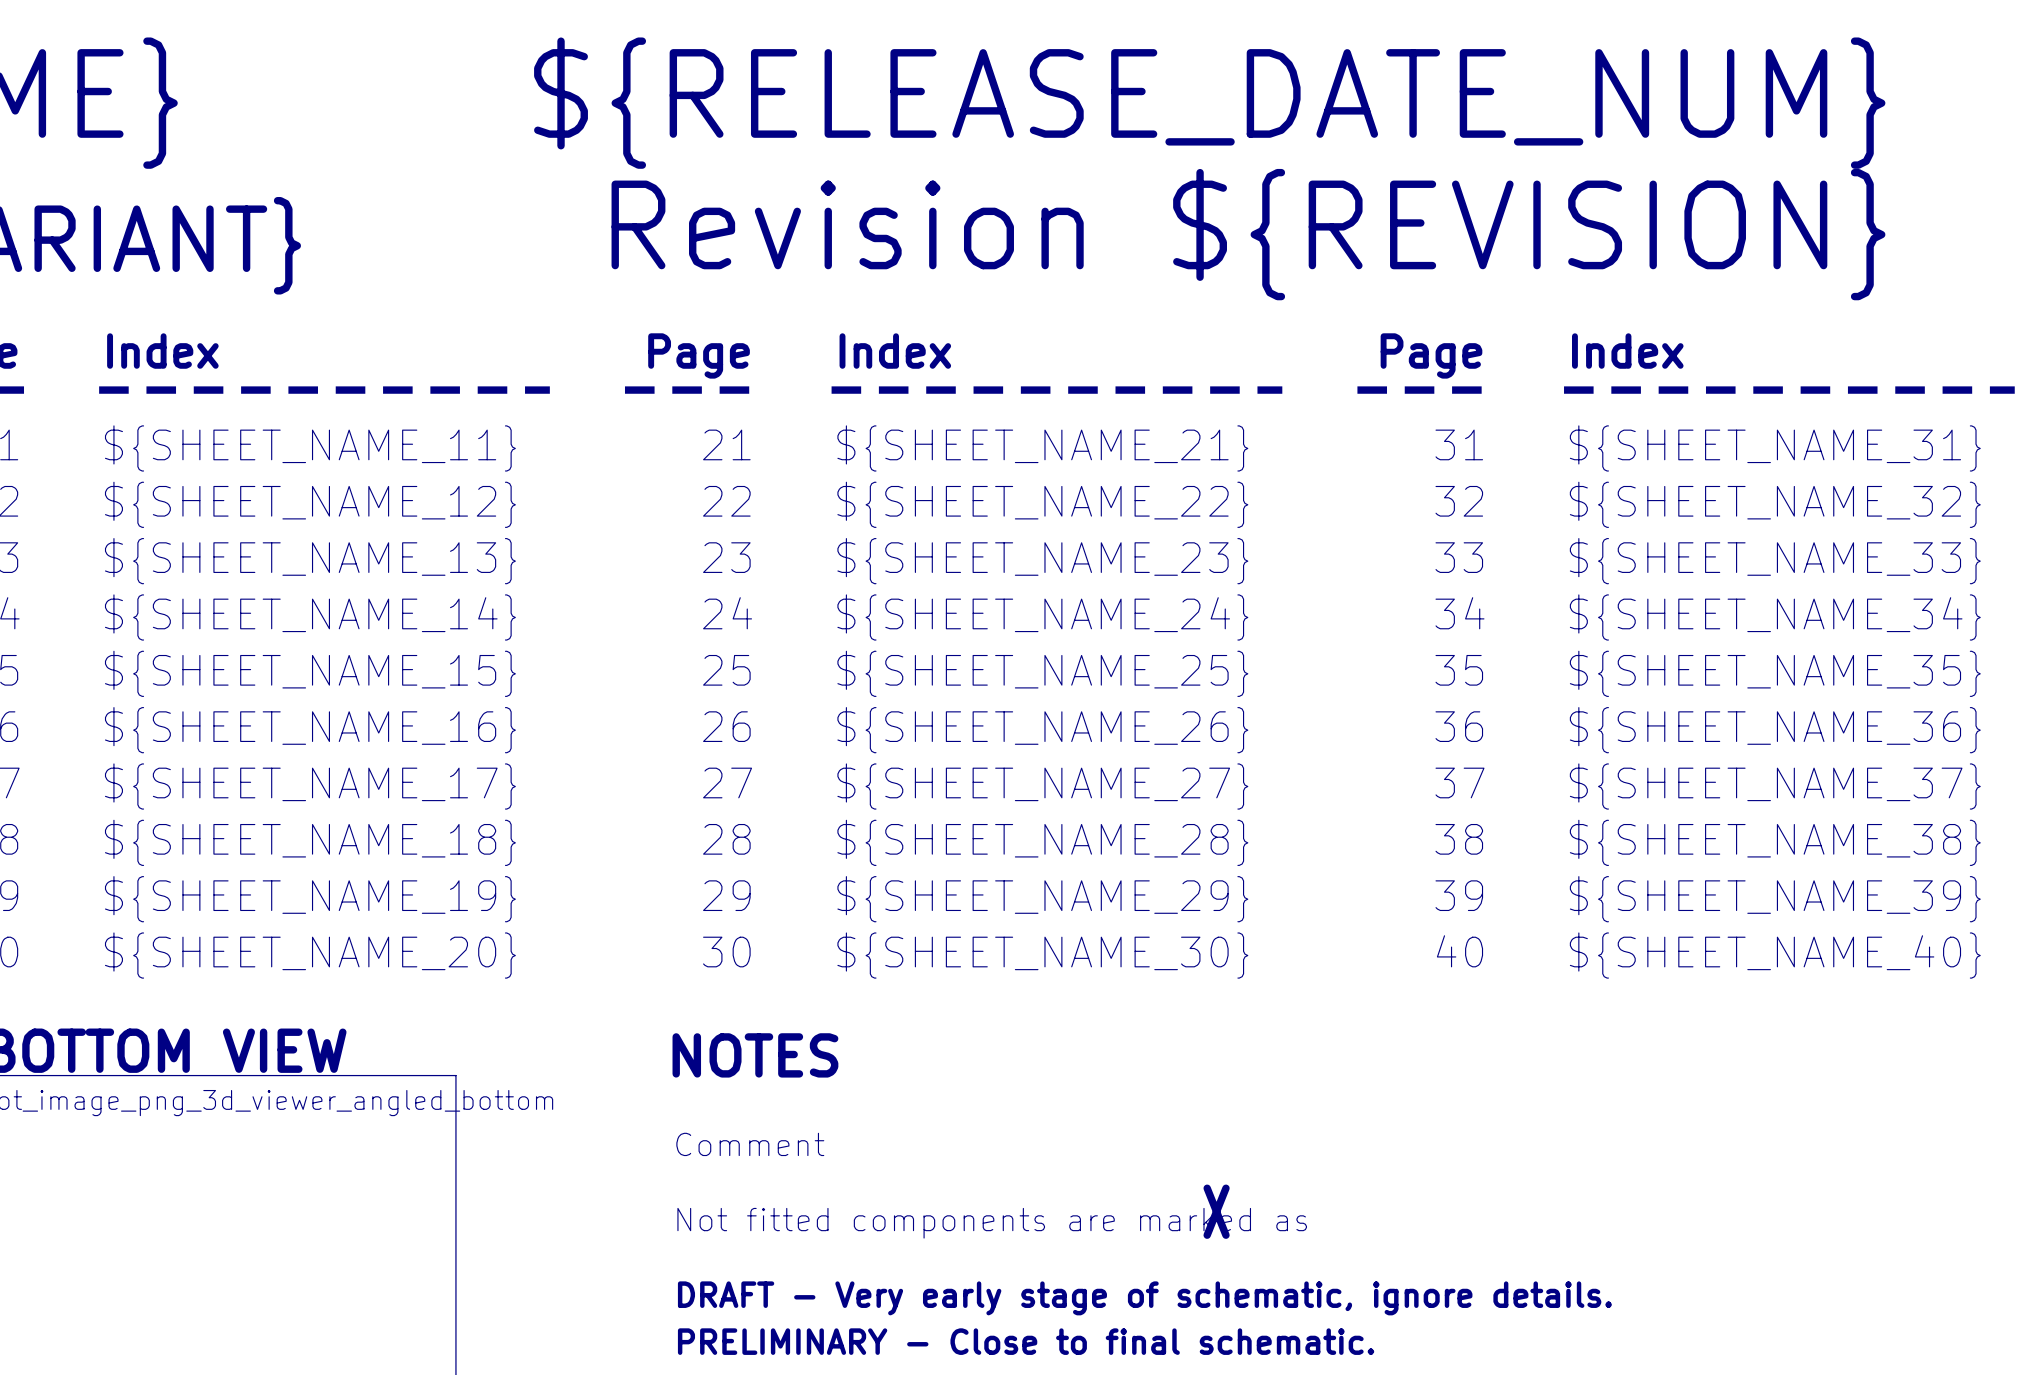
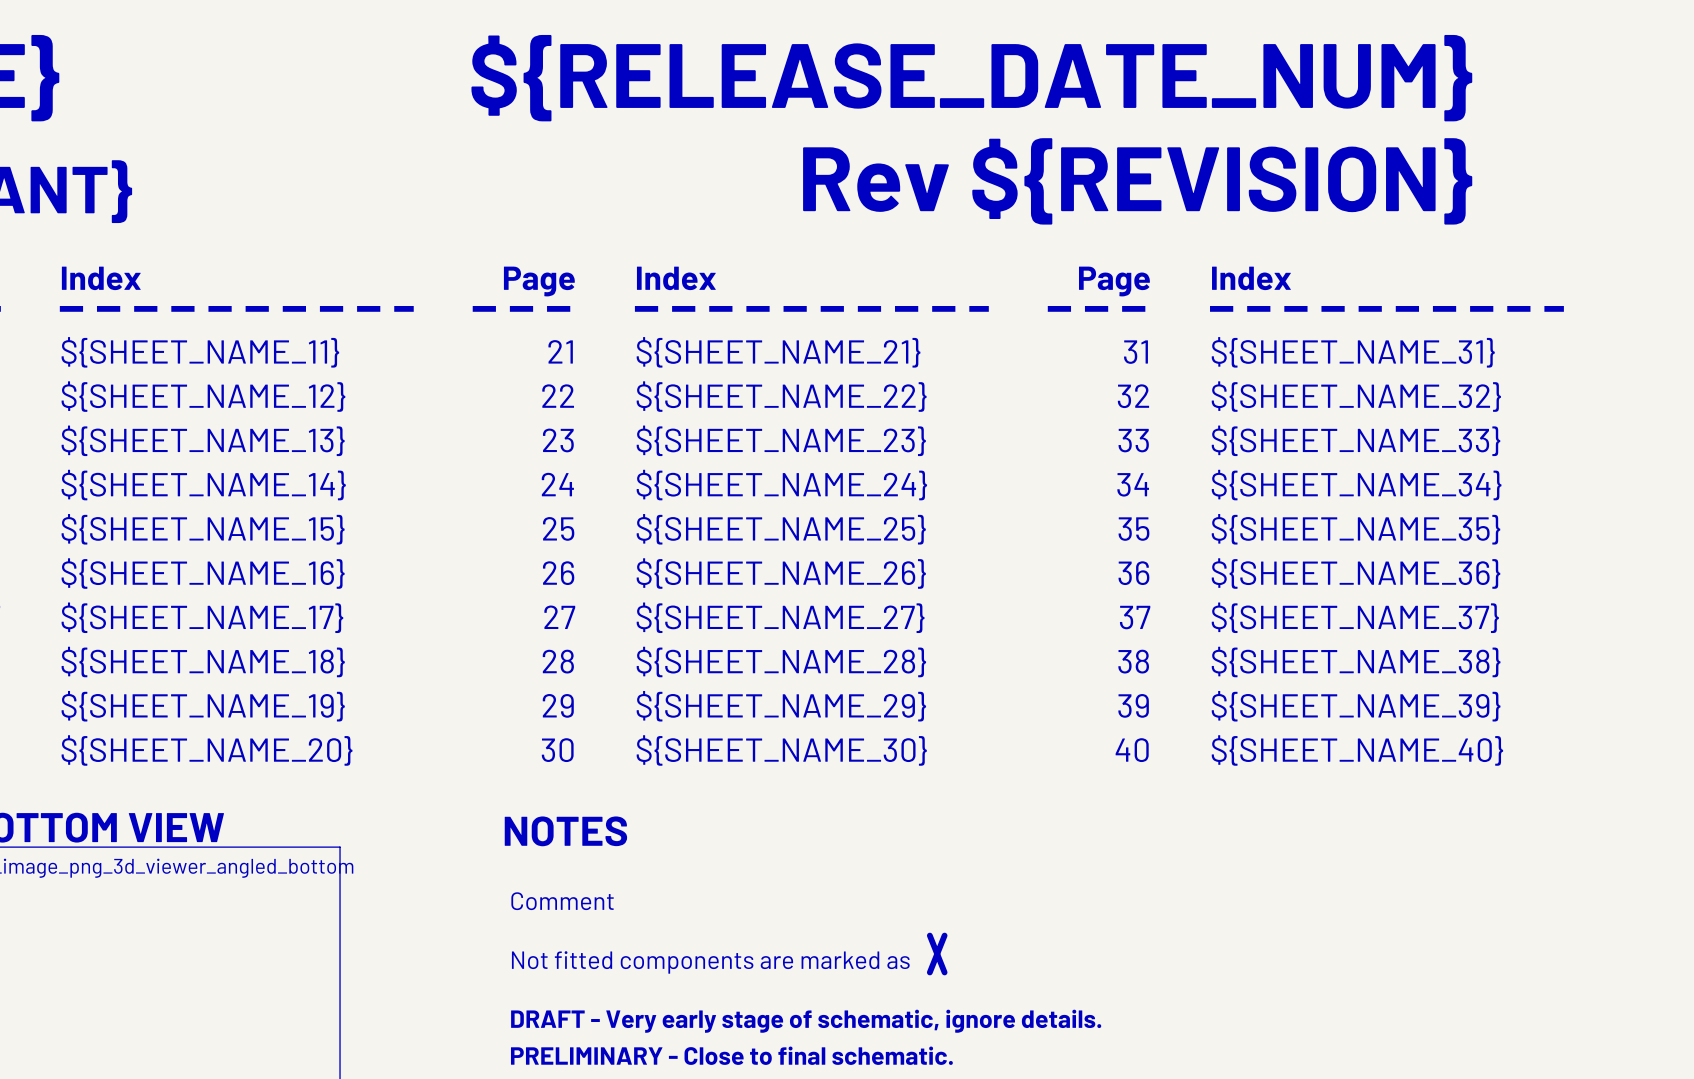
text: Revision ${REVISION} (1248, 234) -> Rev ${REVISION} (1137, 181)

